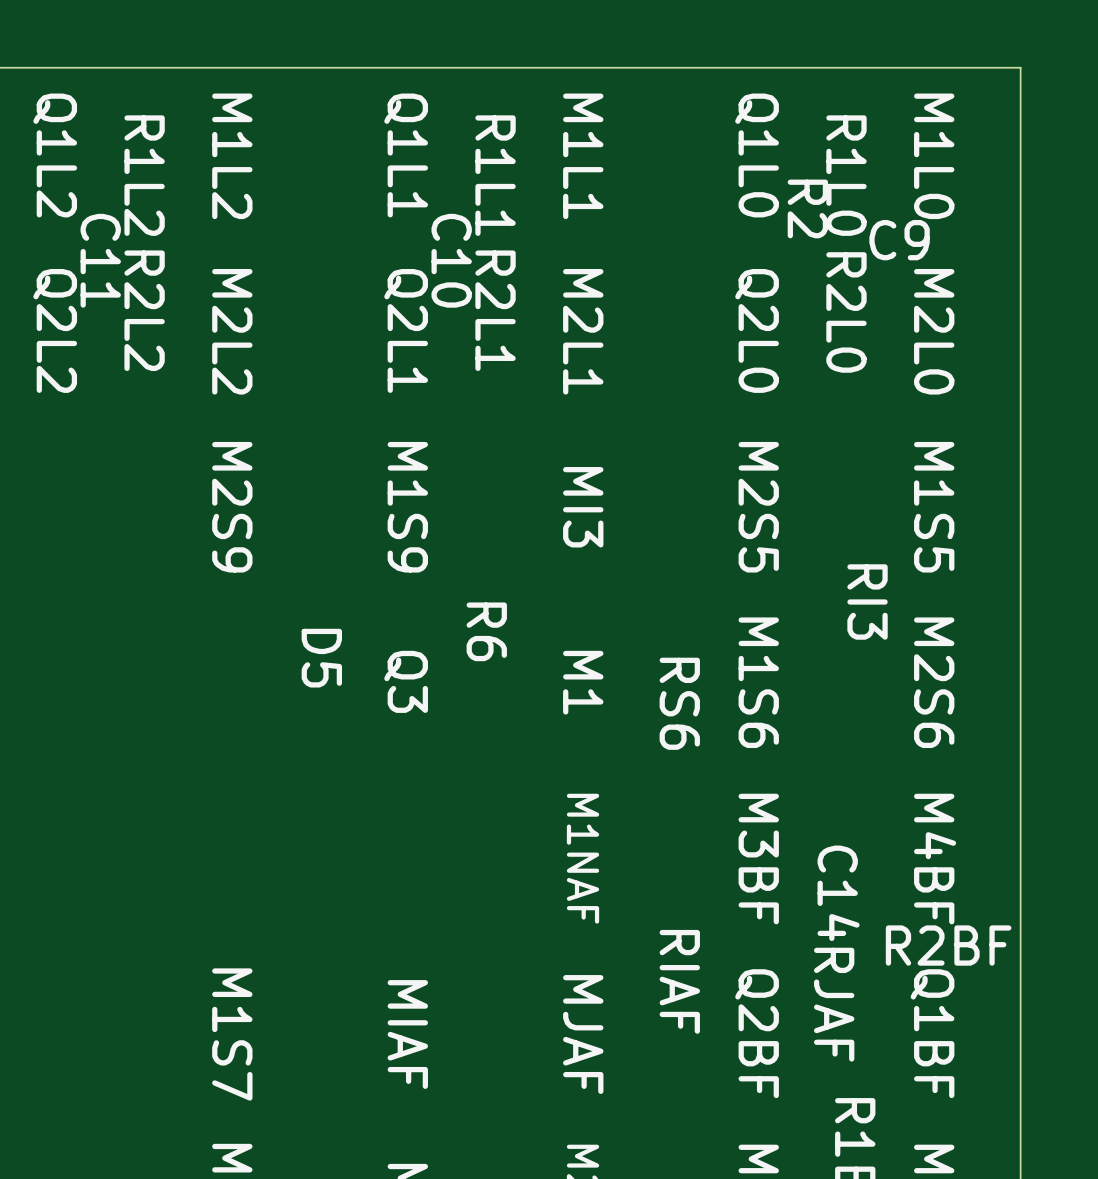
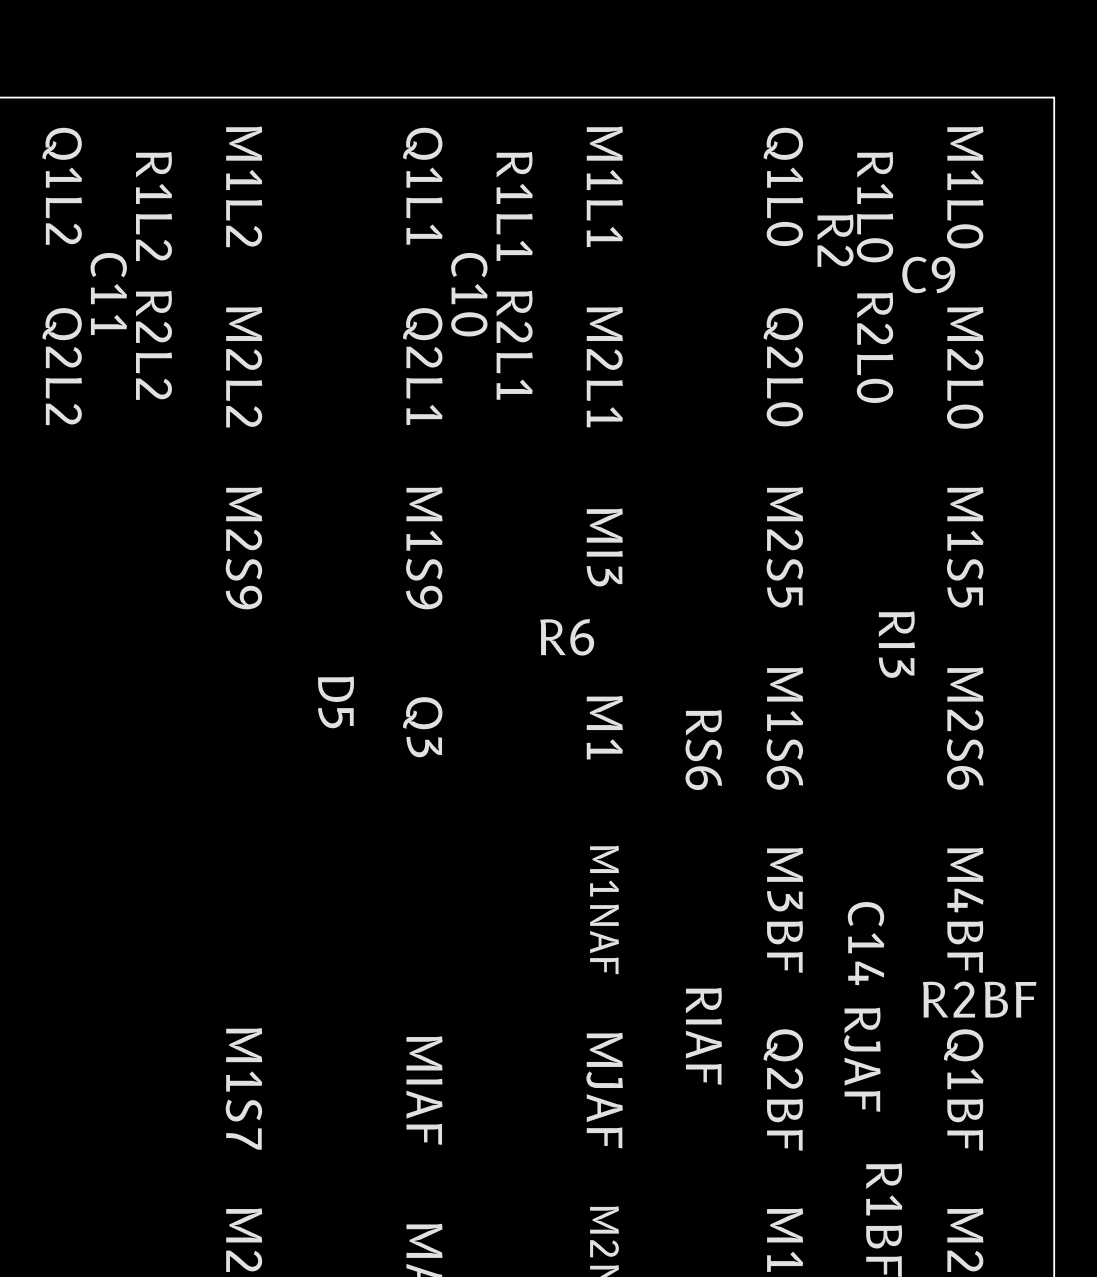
R6 position: (486, 631) -> (567, 637)
R6 name rotation: 0° (486, 631) -> 90° counterclockwise (567, 637)

